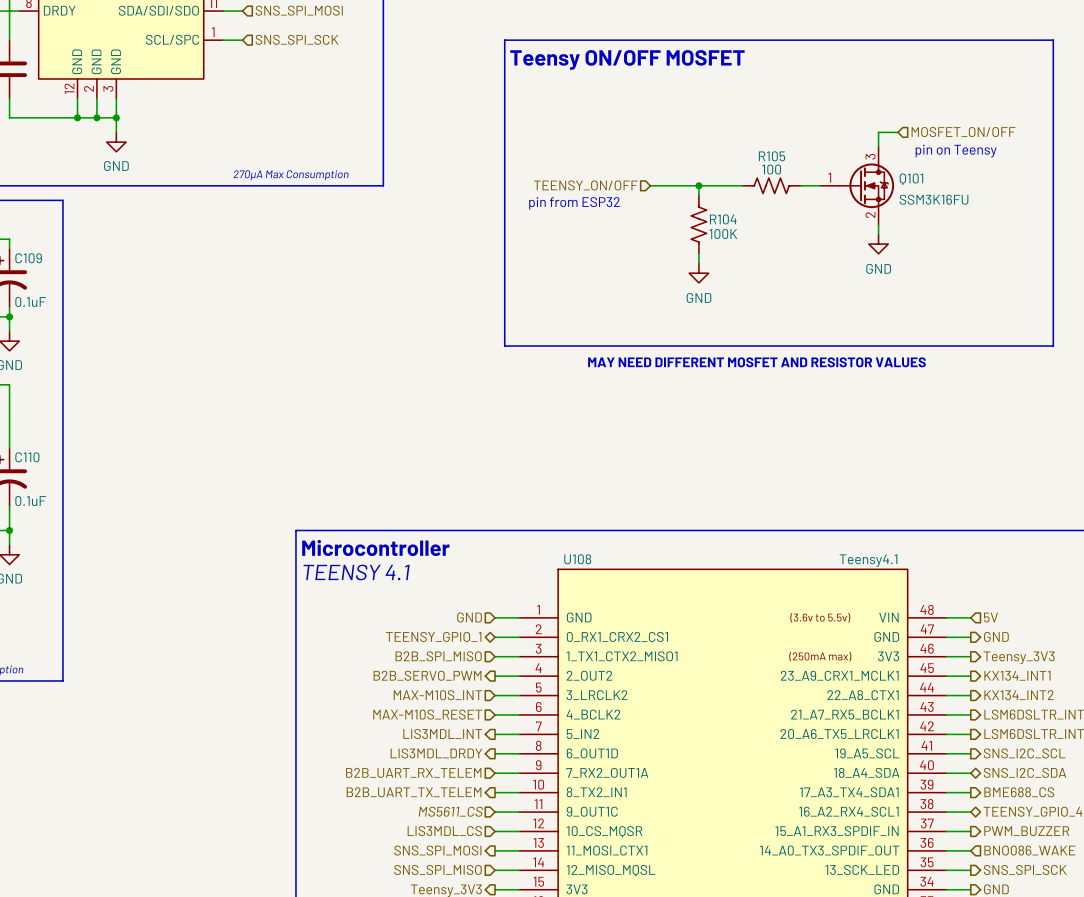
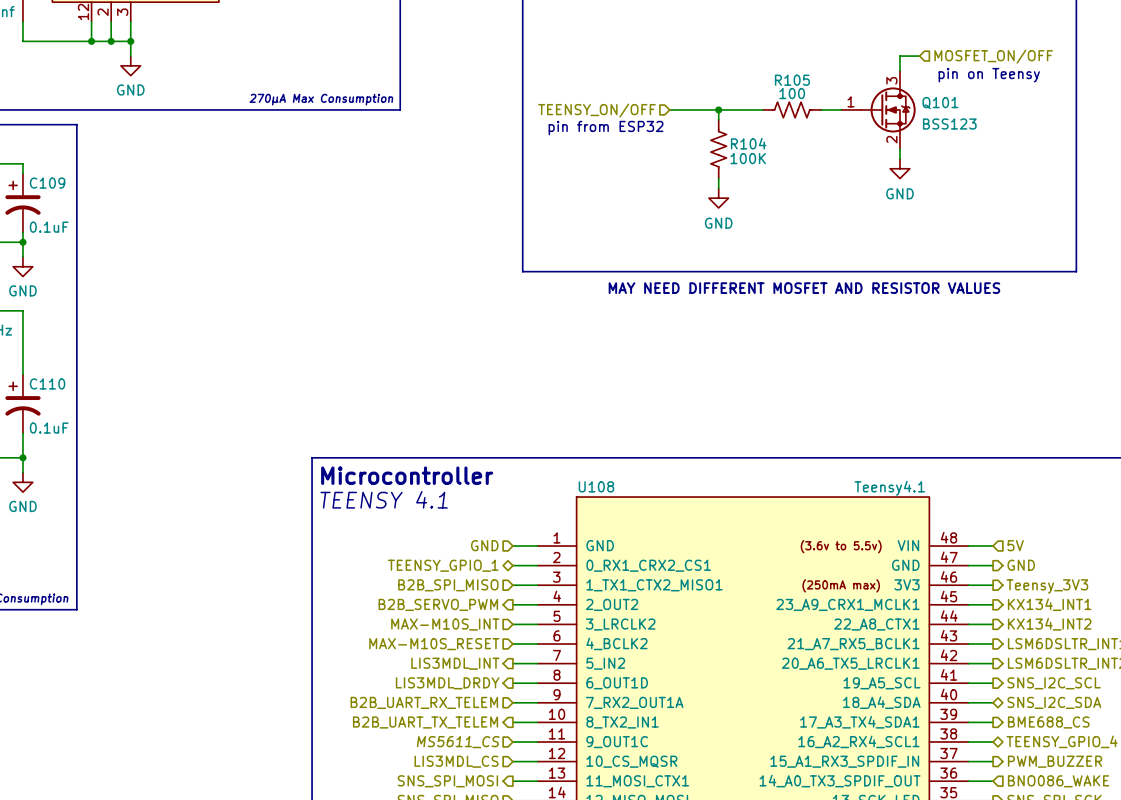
Q101 value: SSM3K16FU (934, 199) -> BSS123 (949, 124)

